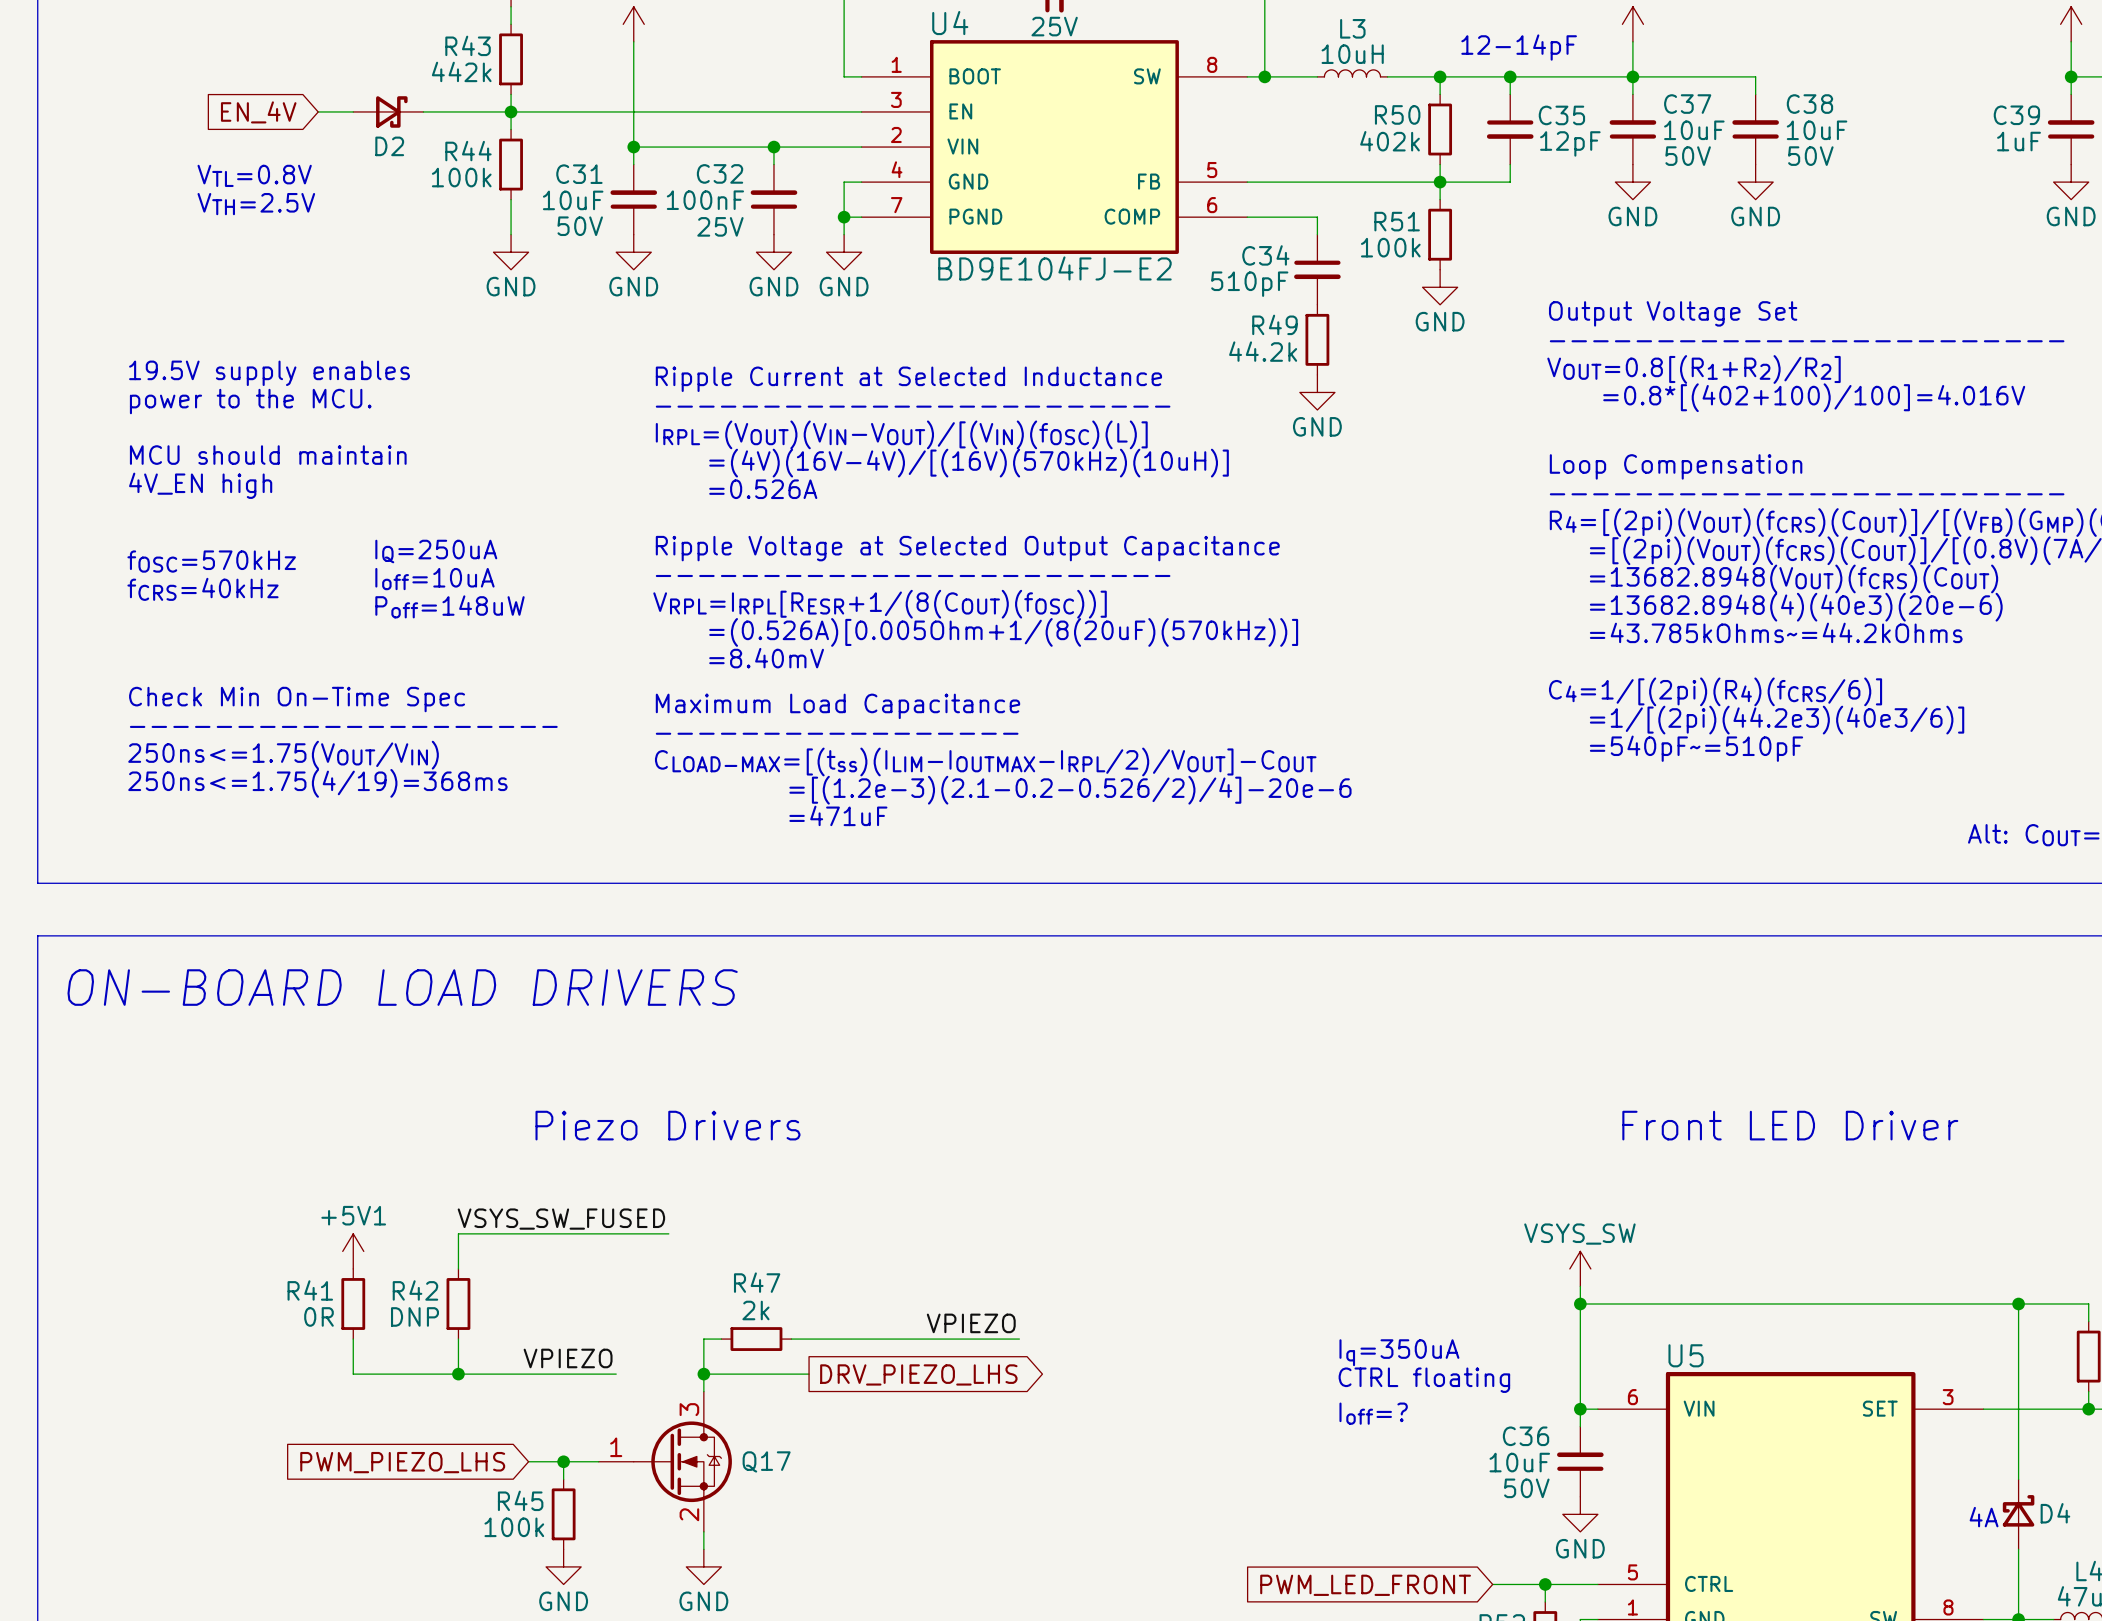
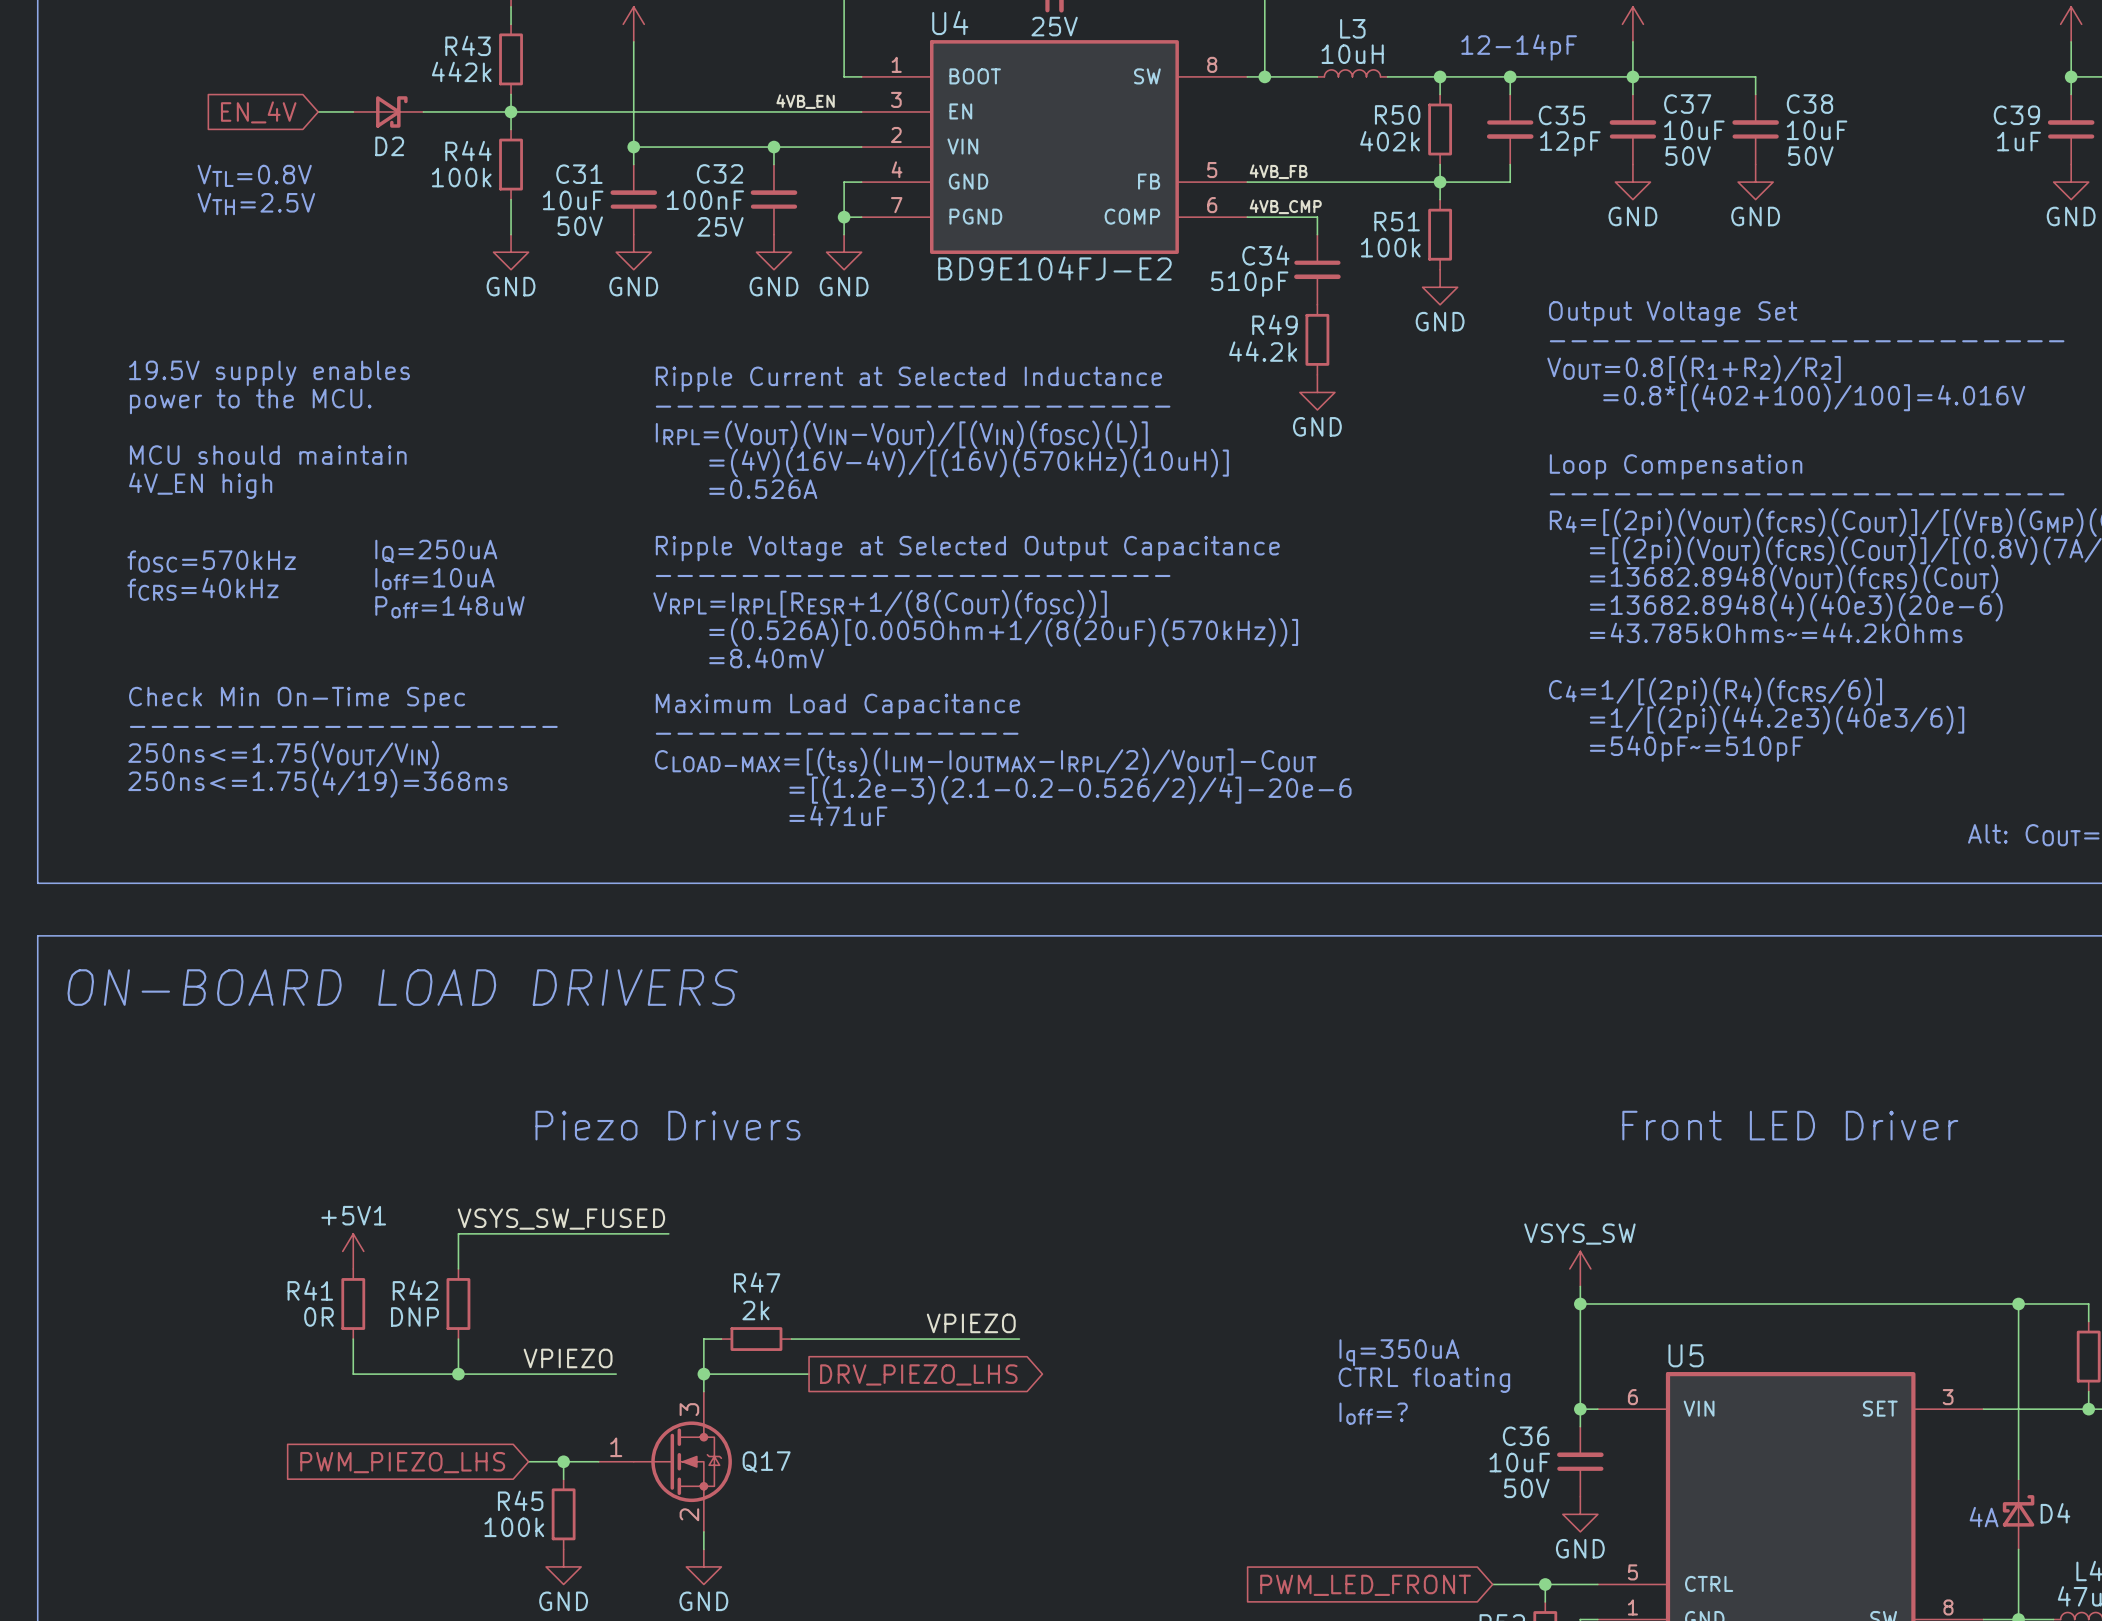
label: none -> 4VB_EN (805, 101)
label: none -> 4VB_FB (1278, 171)
label: none -> 4VB_CMP (1285, 206)

